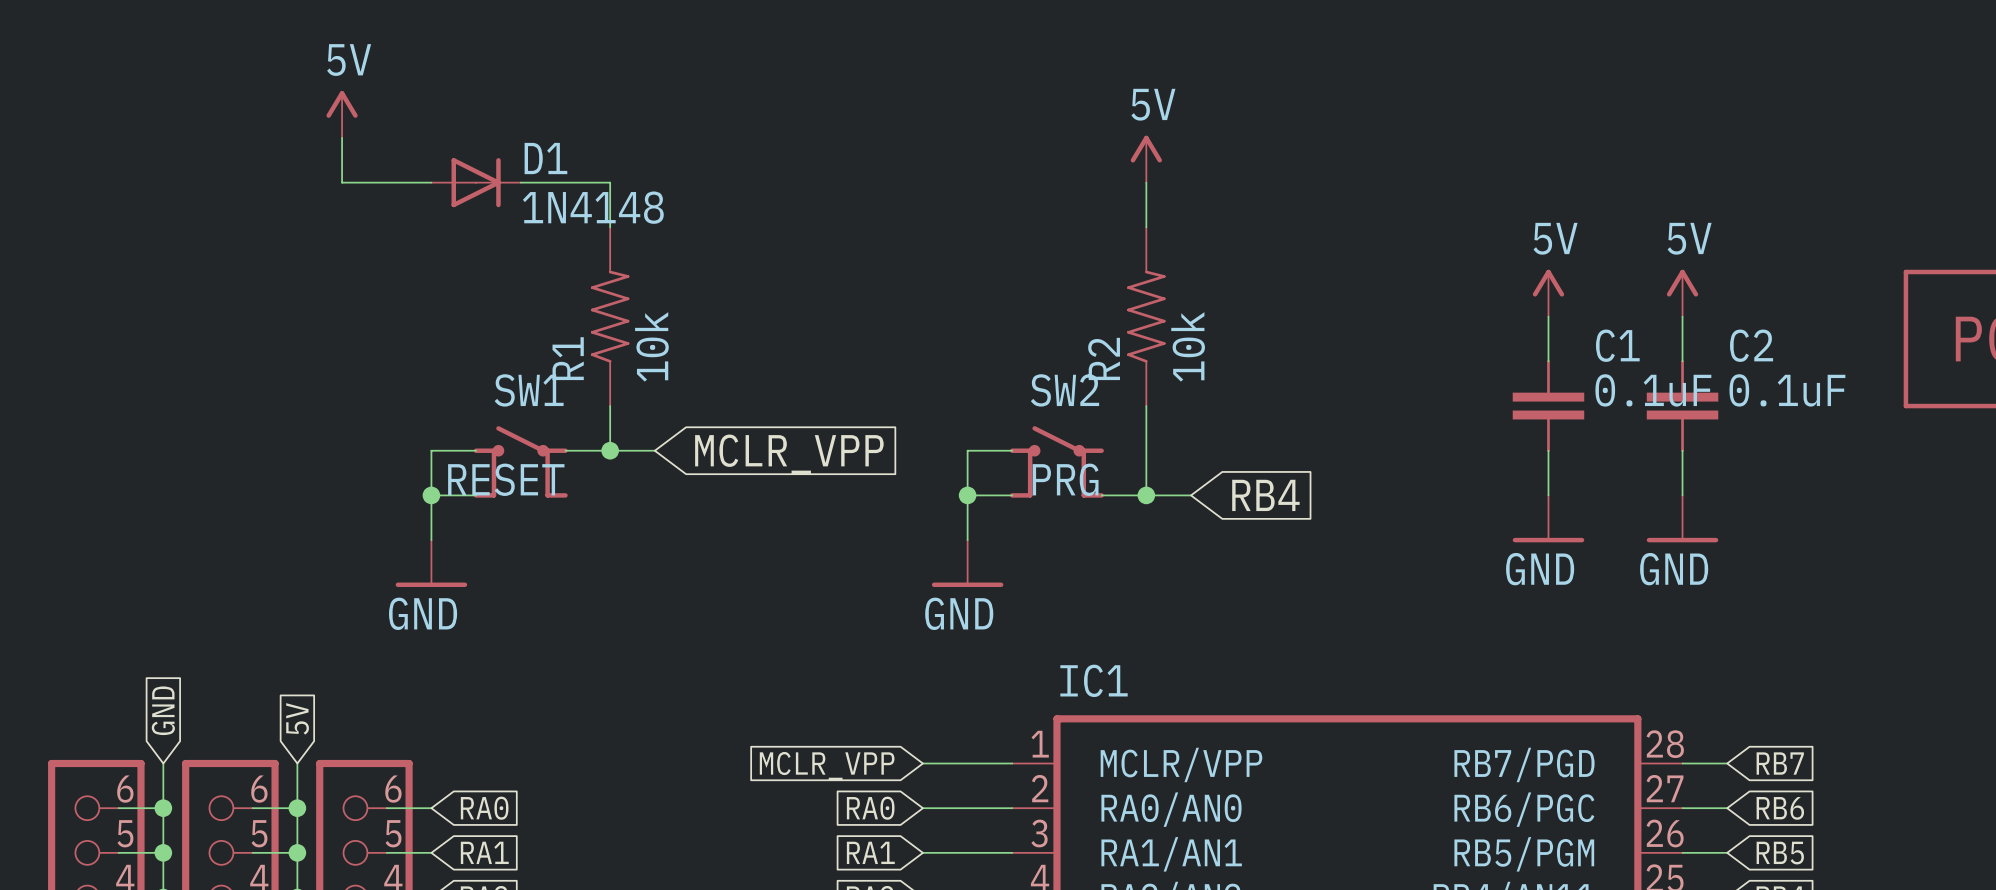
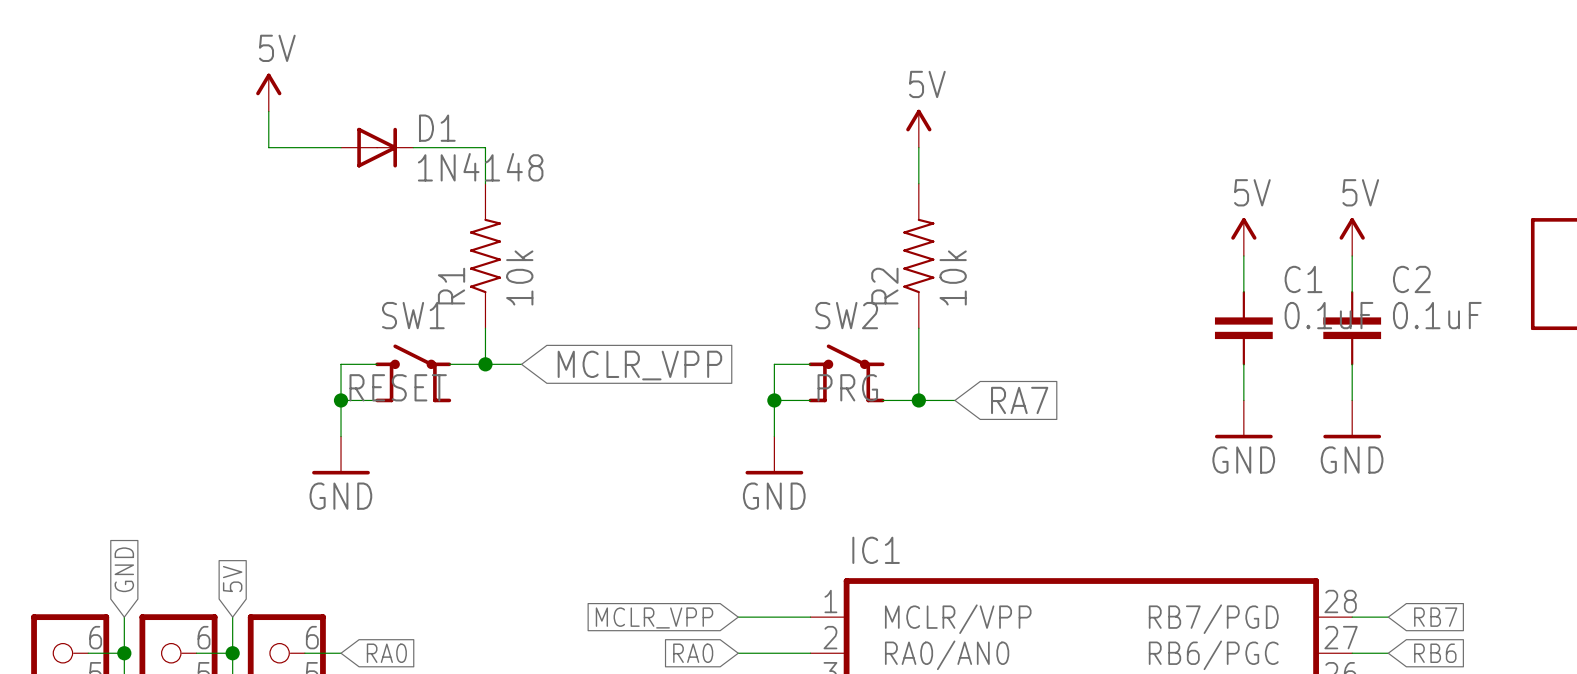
global label: RB4 (1265, 495) -> RA7 (1019, 400)

